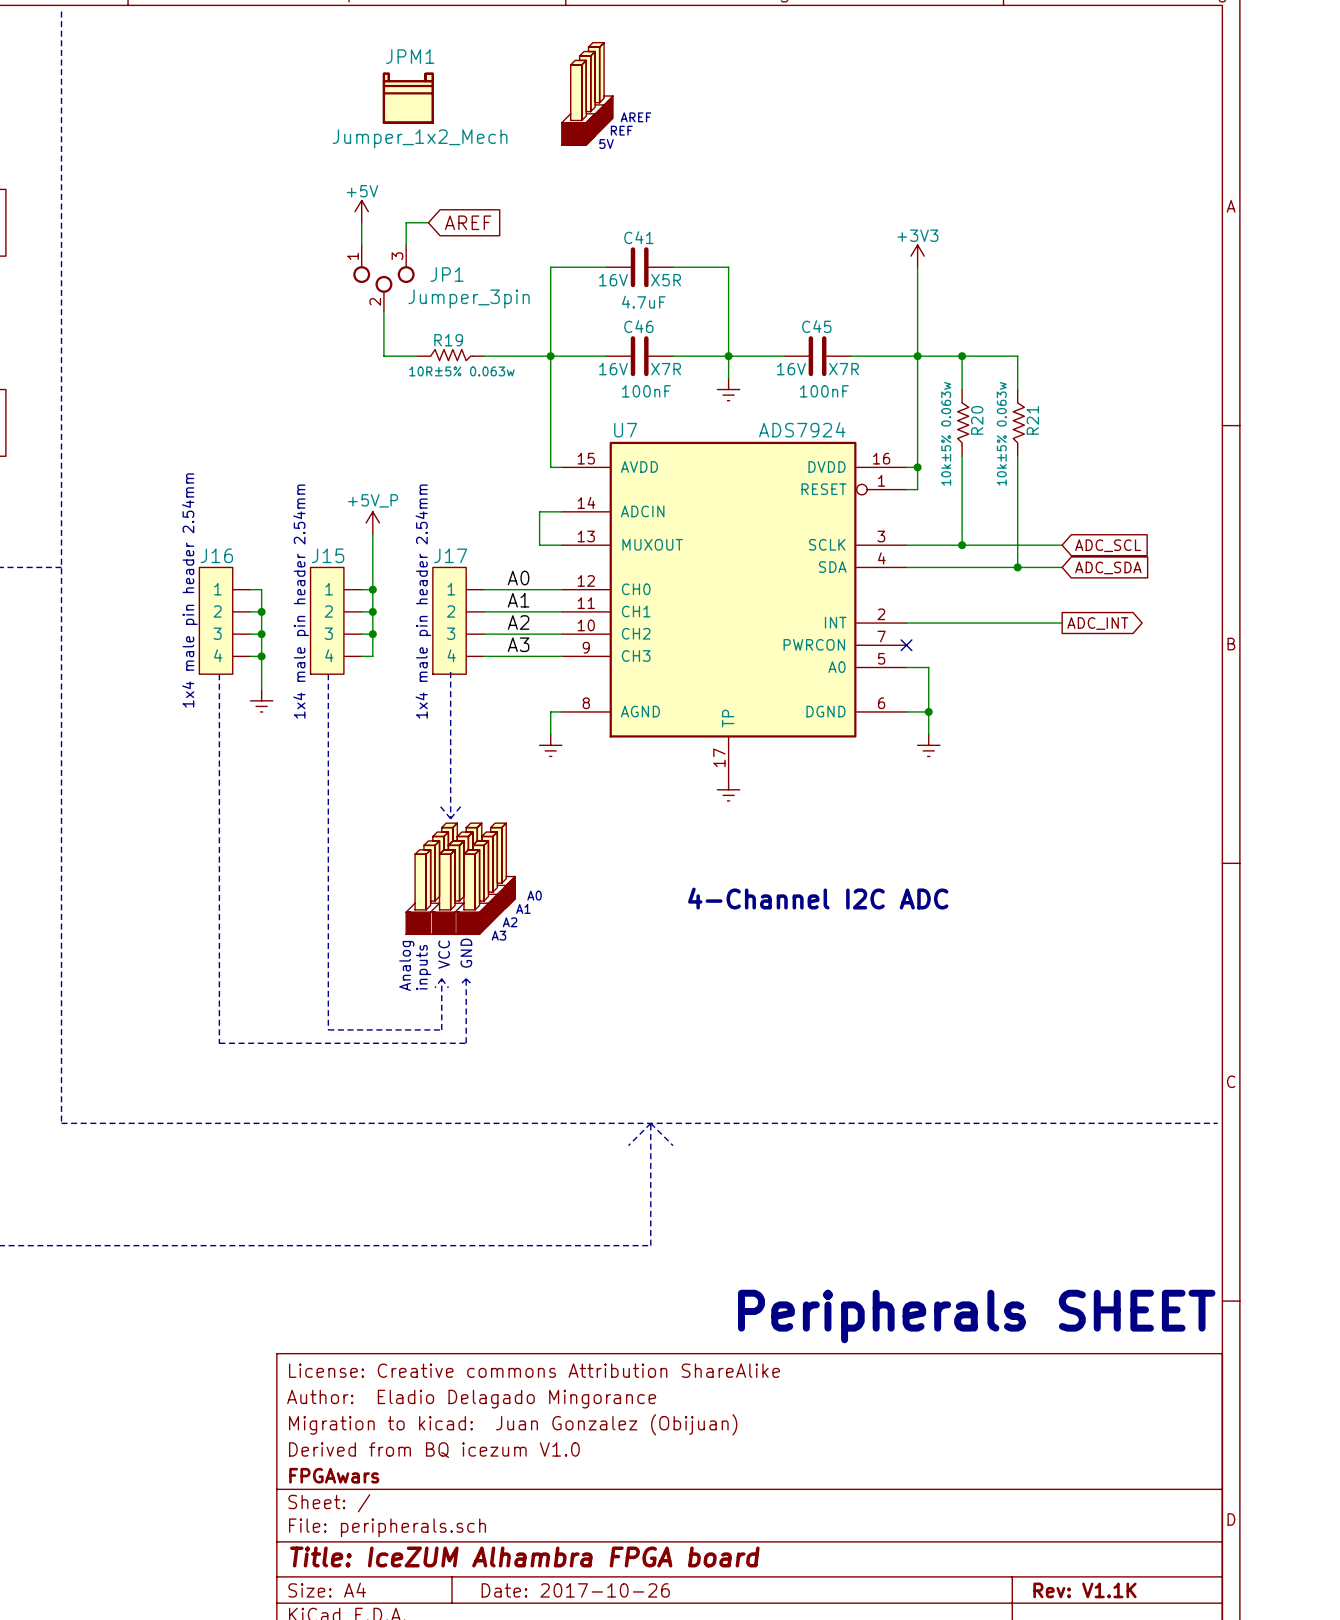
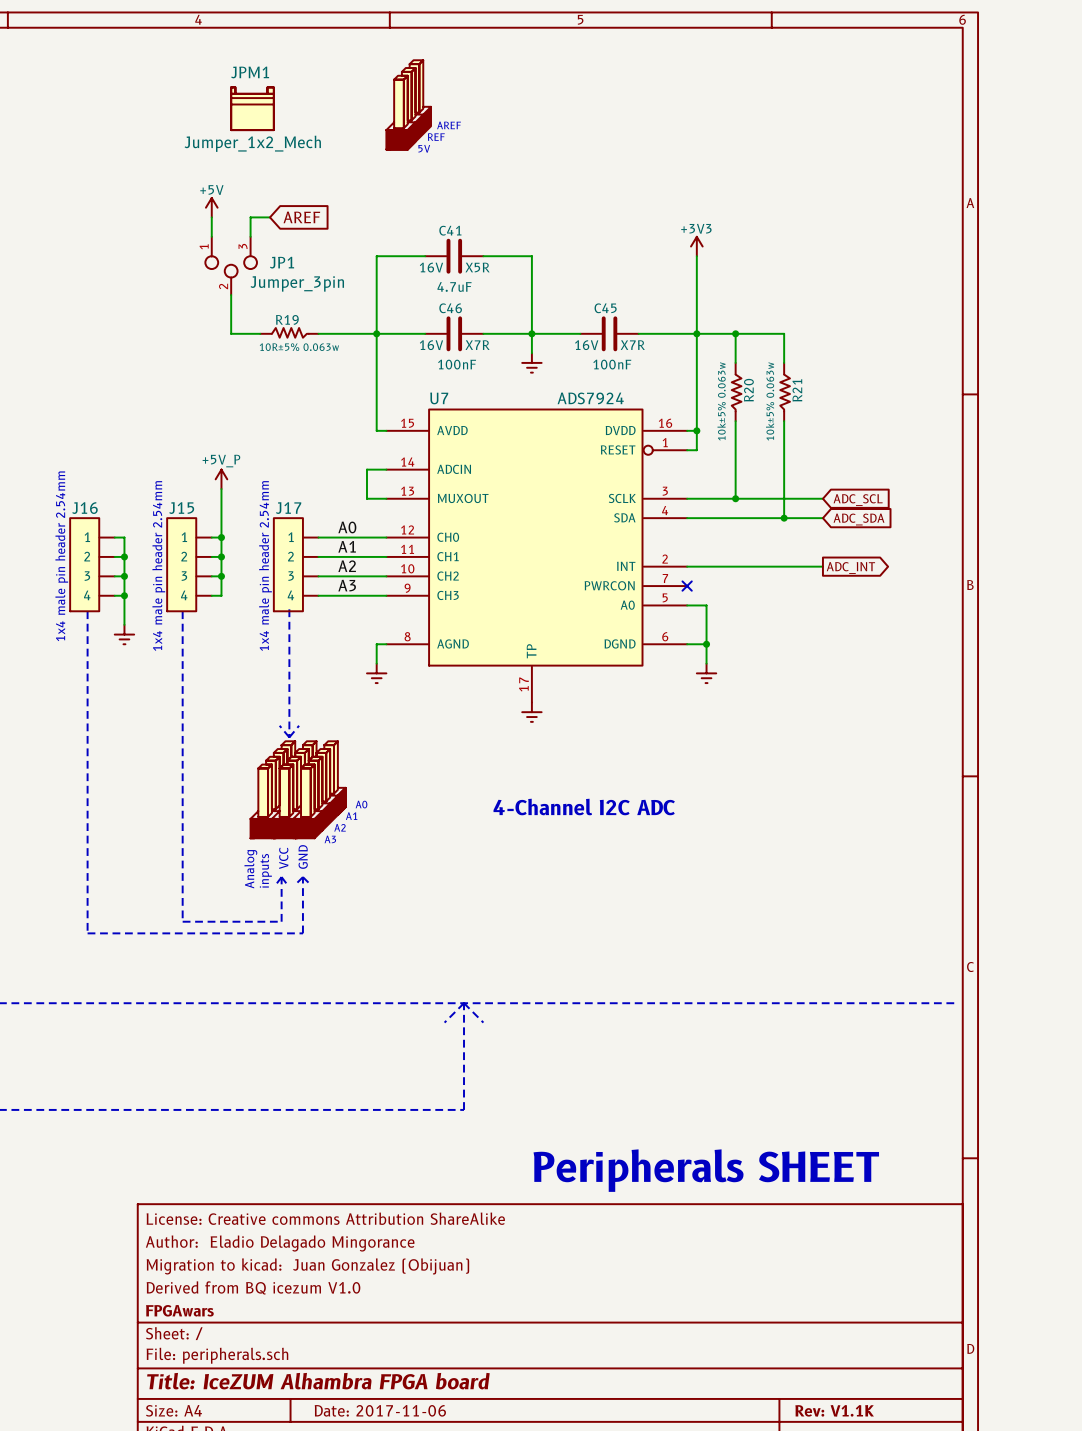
title block: Date: 2017-10-26 (575, 1590) -> Date: 2017-11-06 (380, 1410)

